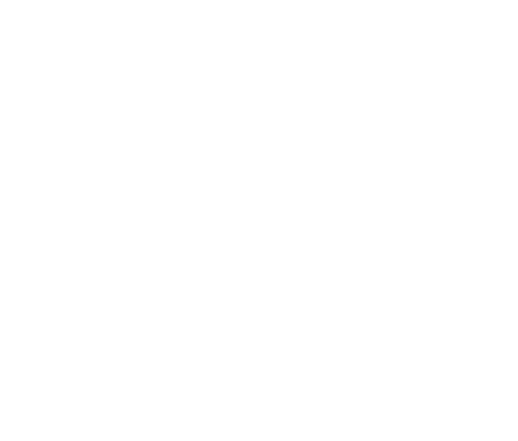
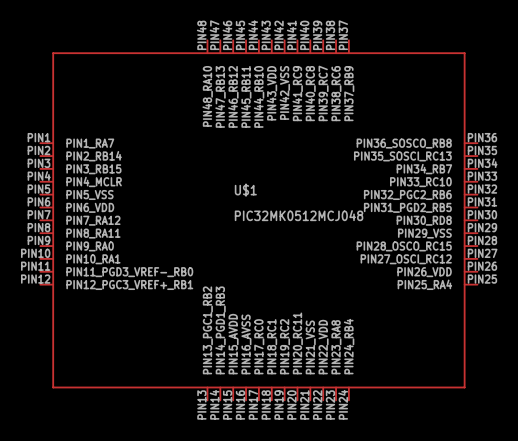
U$1: none -> PIC32MK0512MCJ048 (258, 220)

